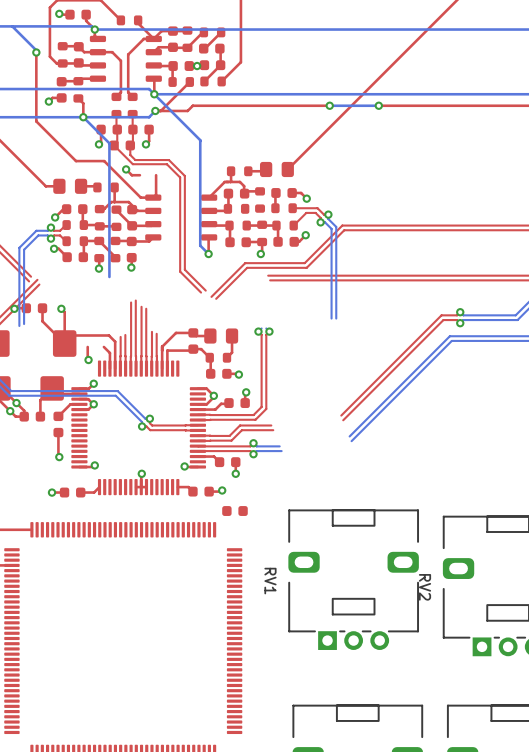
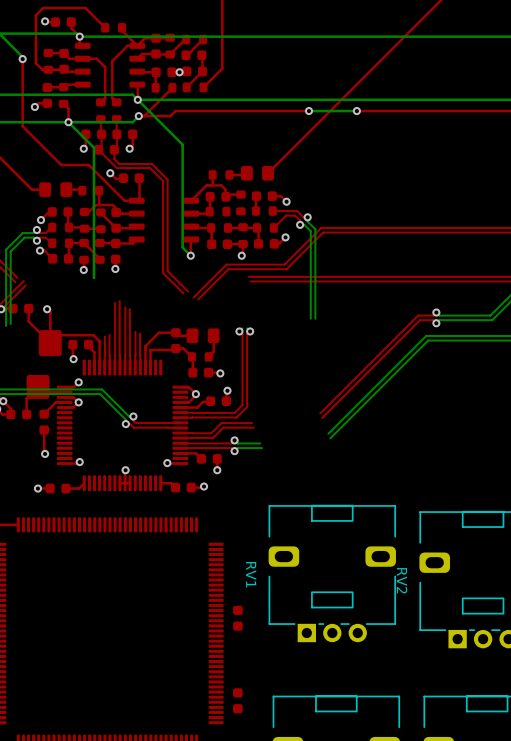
part: none -> (131, 178)
part: none -> (80, 344)
part: (234, 511) -> none
part: none -> (237, 618)
part: none -> (237, 700)

